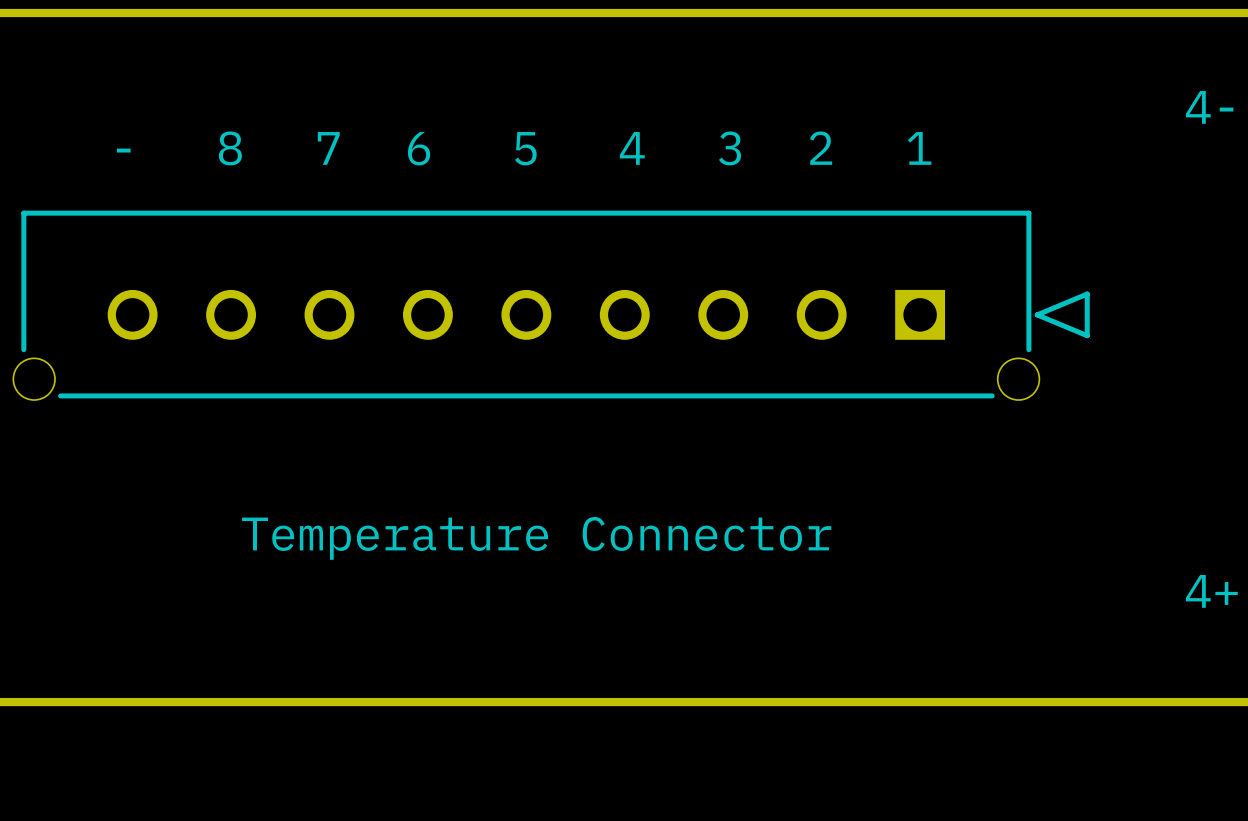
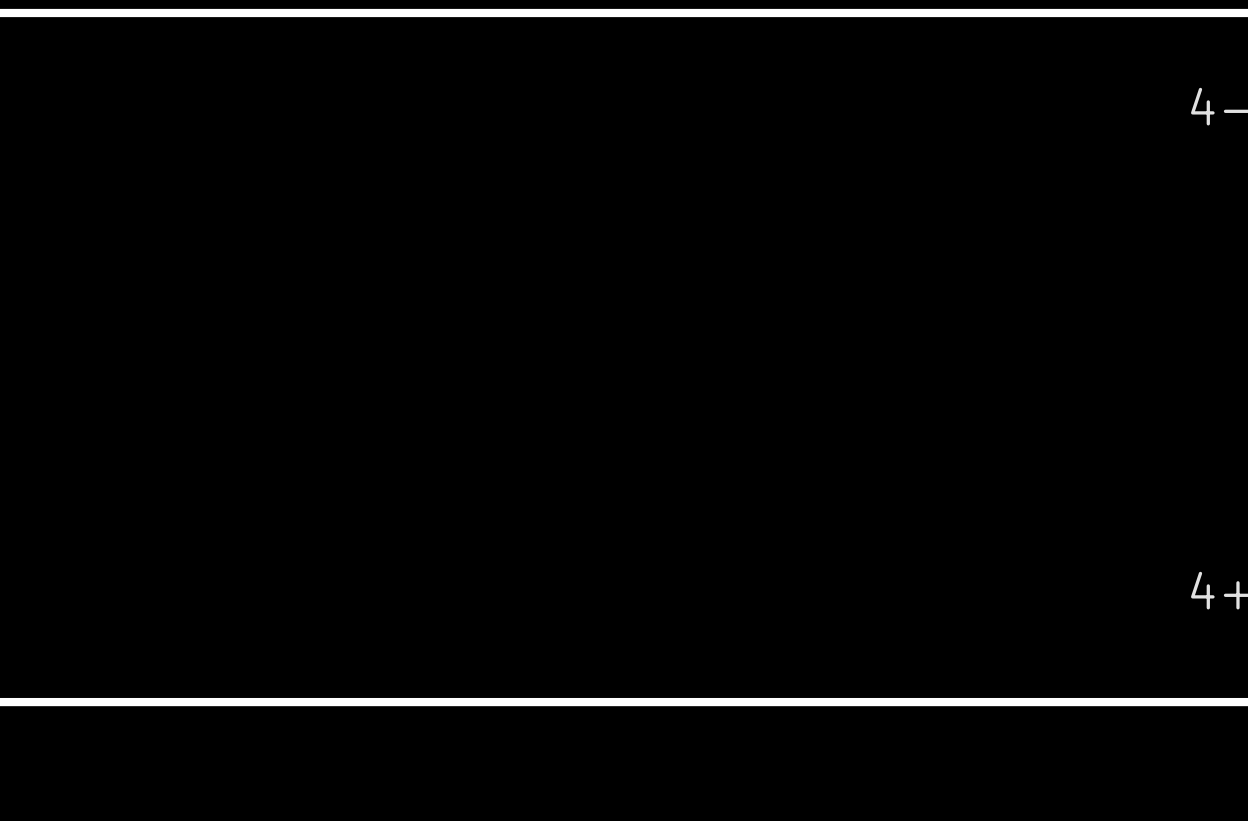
text: 8 (230, 148) -> none
text: 7 (328, 148) -> none
text: 6 (419, 148) -> none
text: 5 (525, 148) -> none
text: 4 (632, 148) -> none
text: 3 (729, 148) -> none
text: 2 (821, 148) -> none
text: 1 (919, 148) -> none
text: - (123, 150) -> none
part: (551, 305) -> none
text: Temperature Connector (536, 538) -> none

